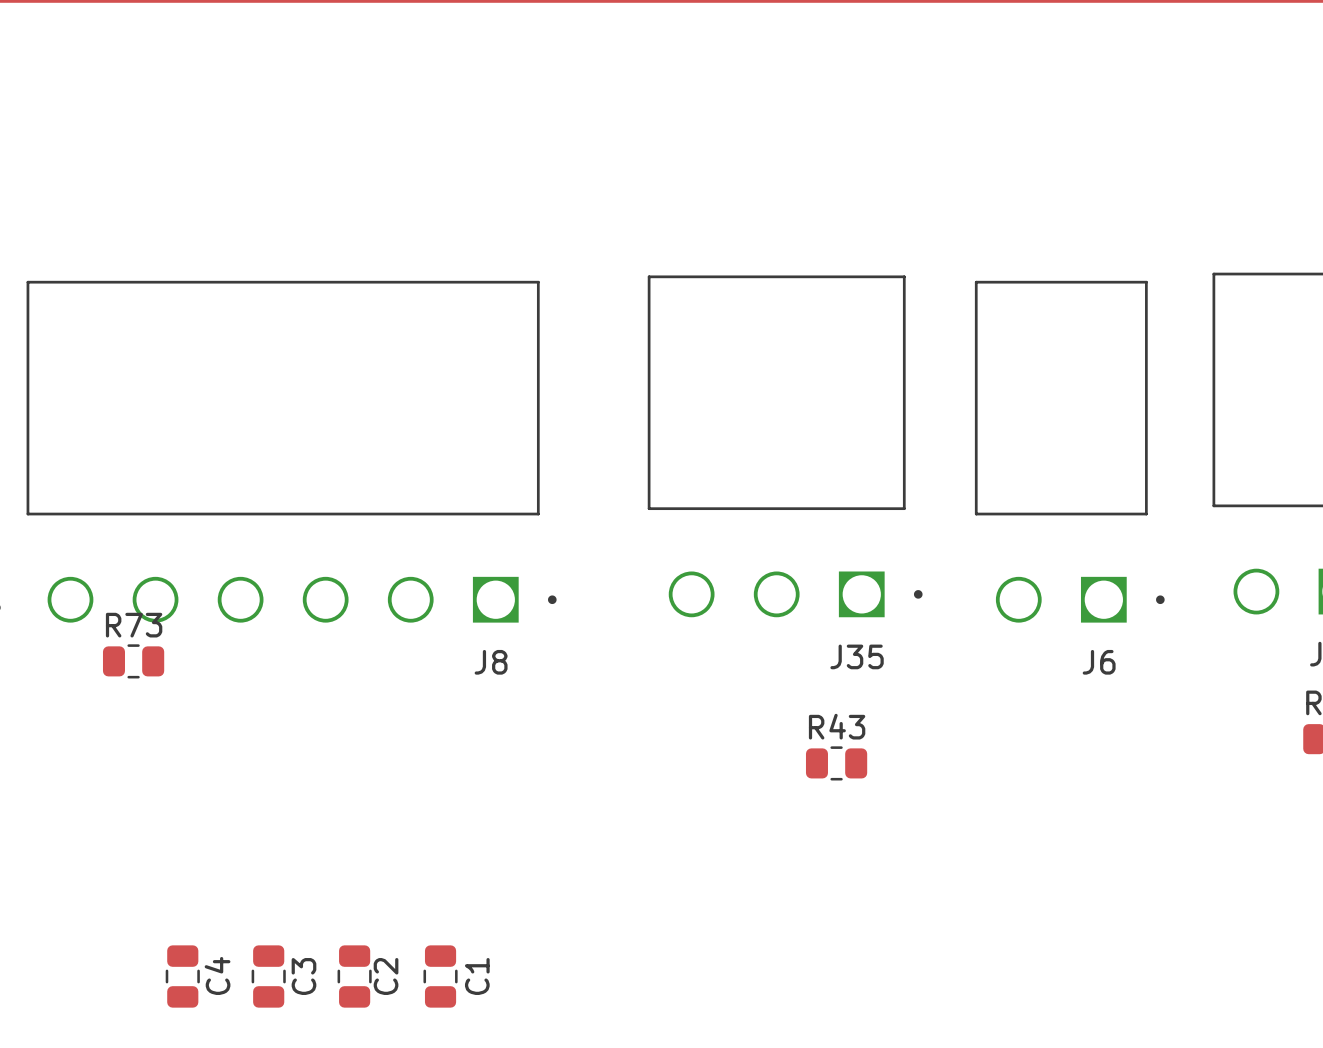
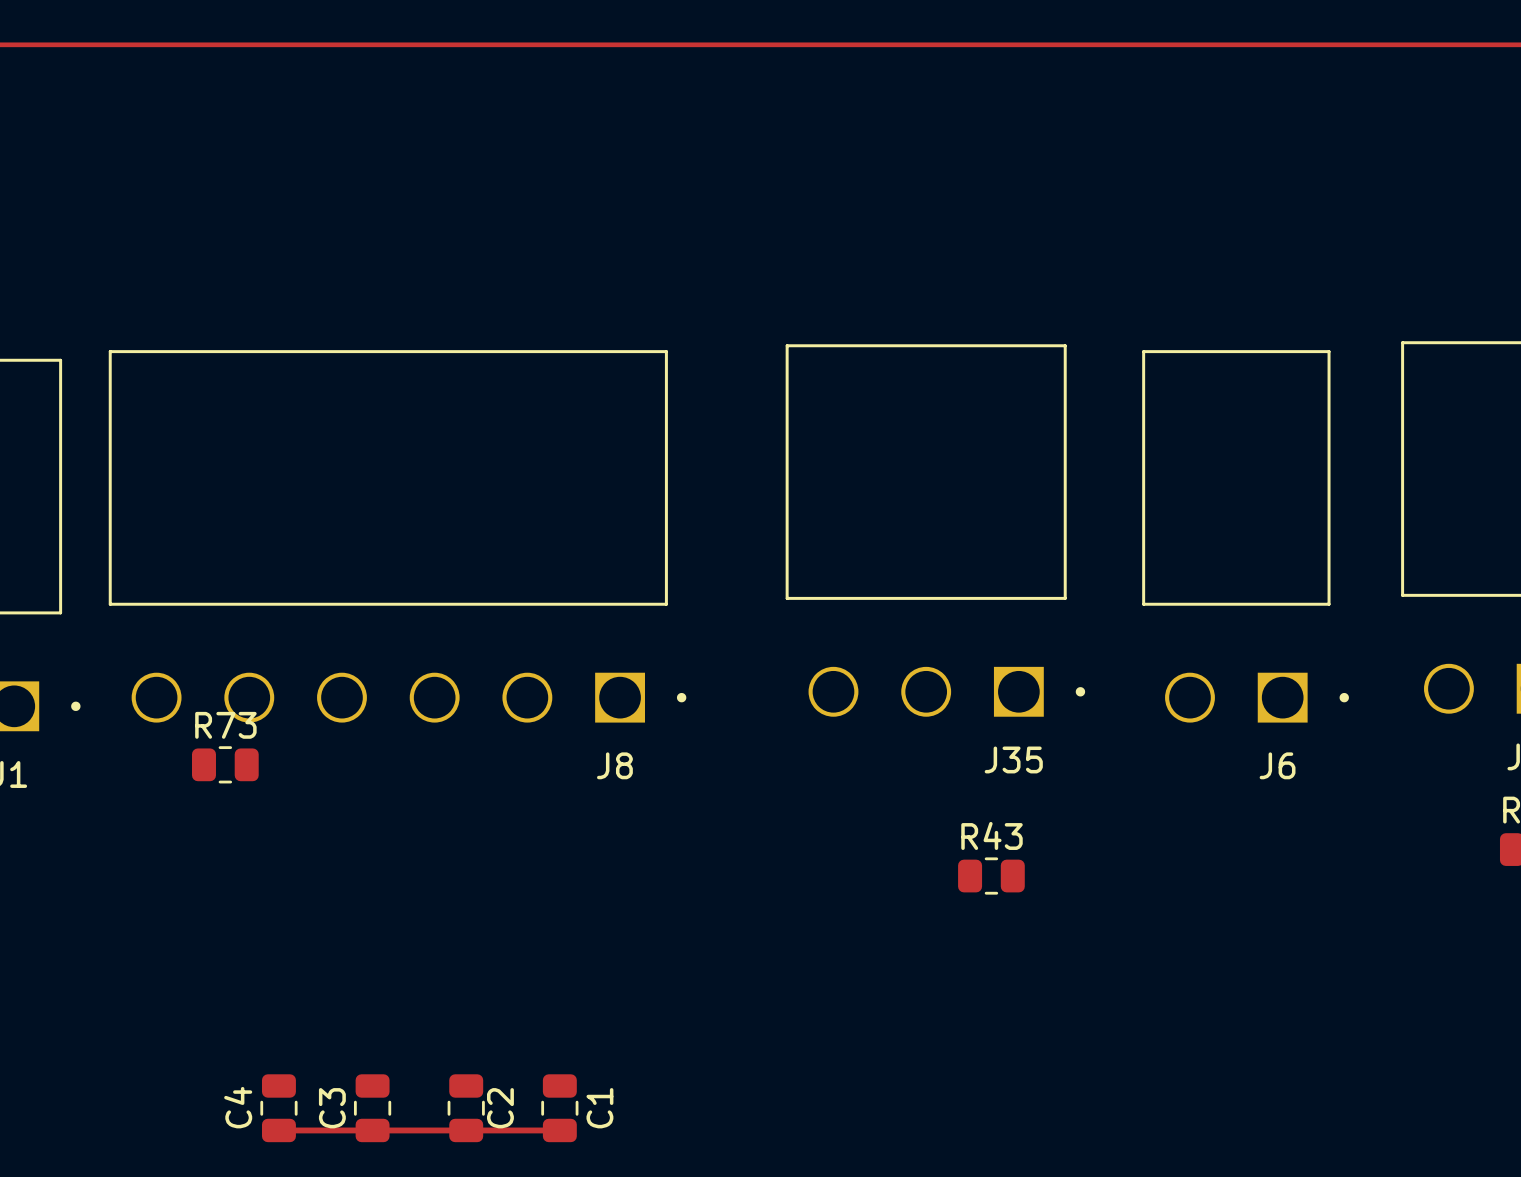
C4 name position: C4 (217, 975) -> C4 (238, 1107)
C3 name position: C3 (303, 976) -> C3 (332, 1108)
top track: none -> (278, 1130) (559, 1130)

